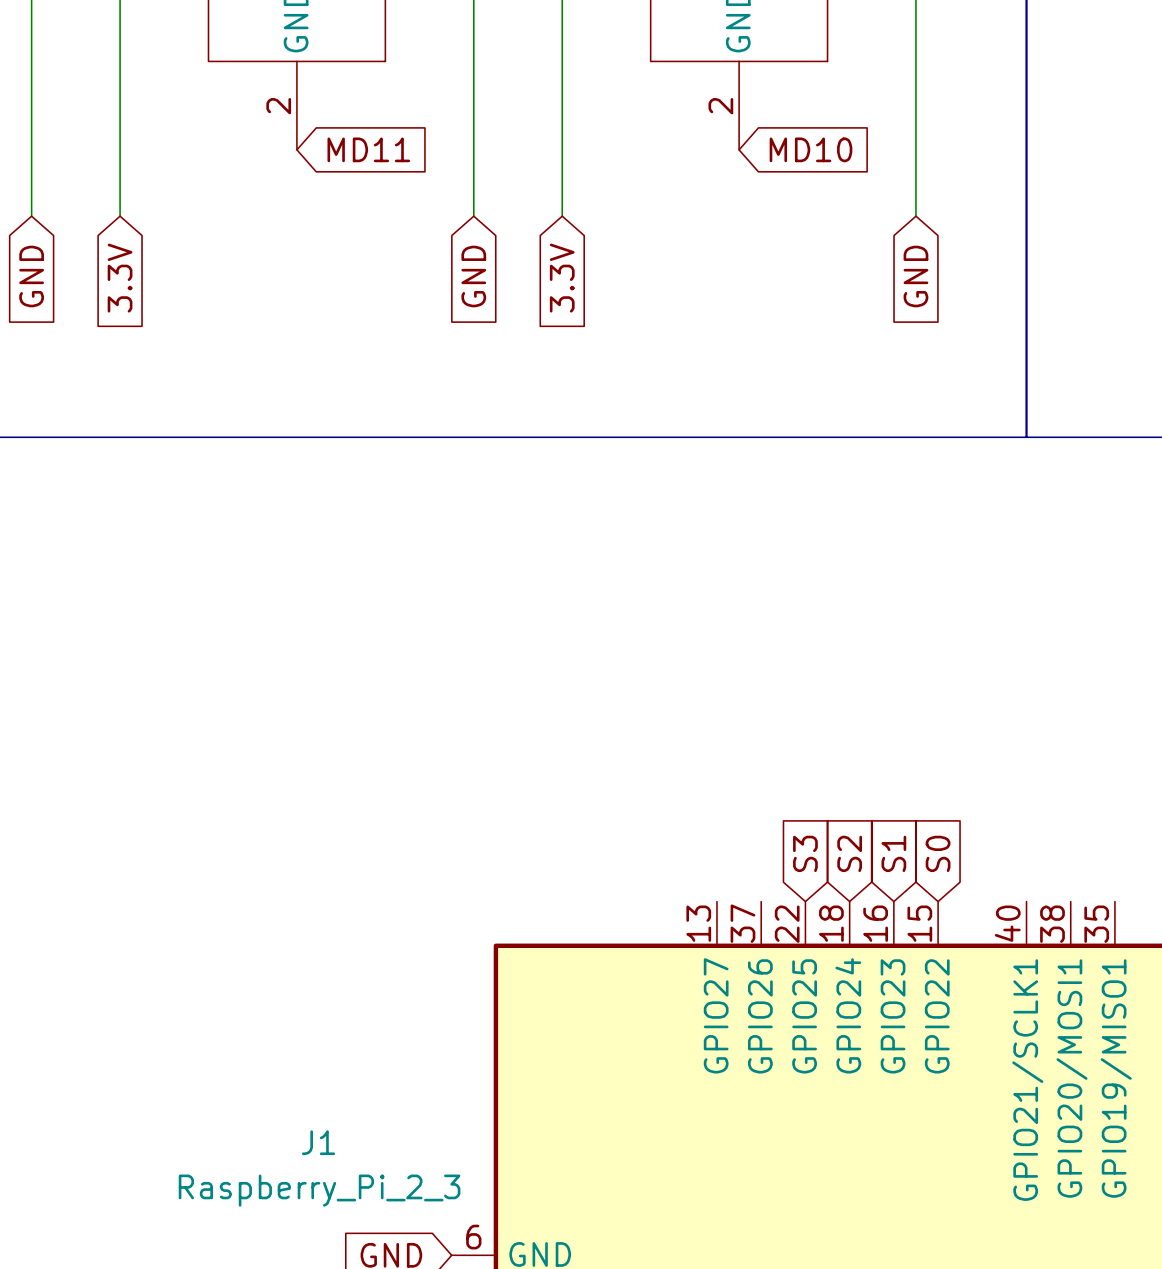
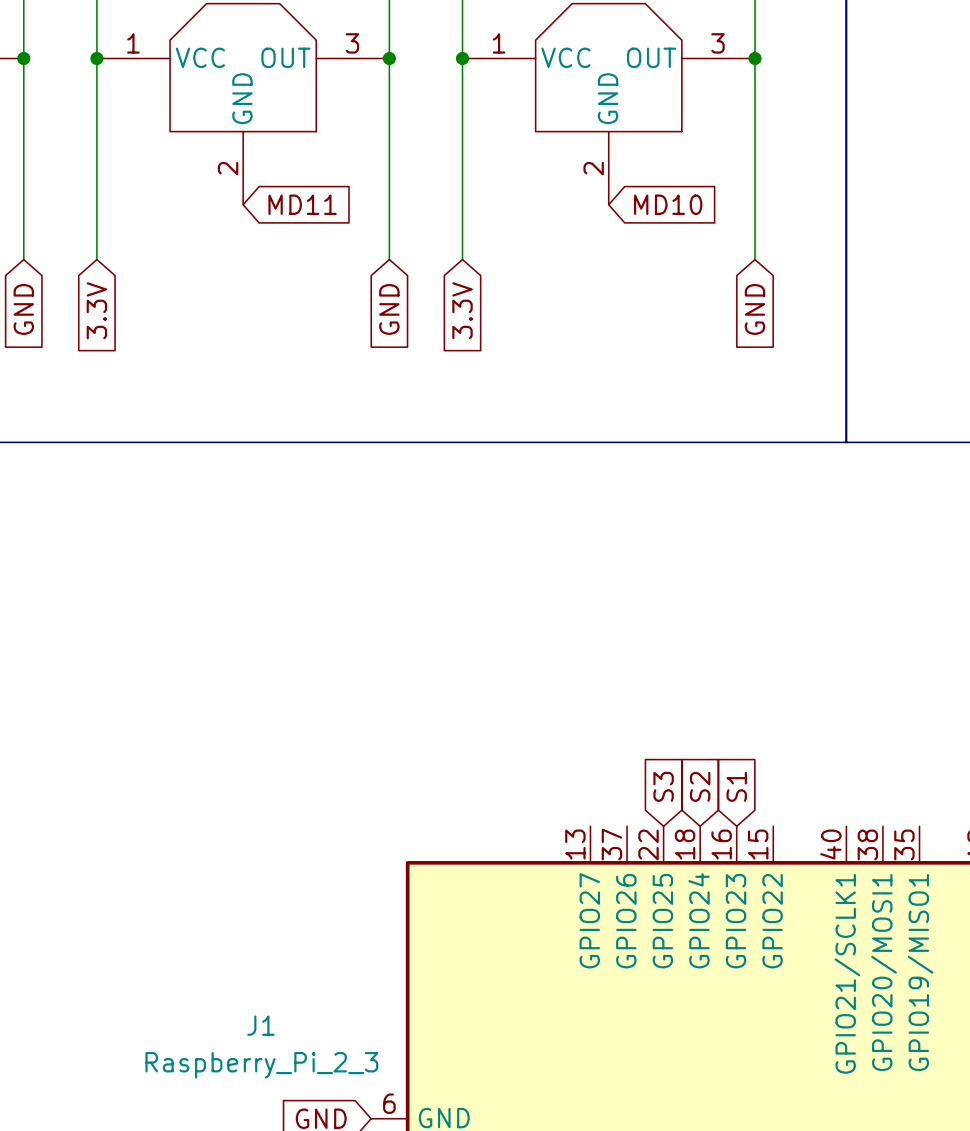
global label: S0 (938, 853) -> none

